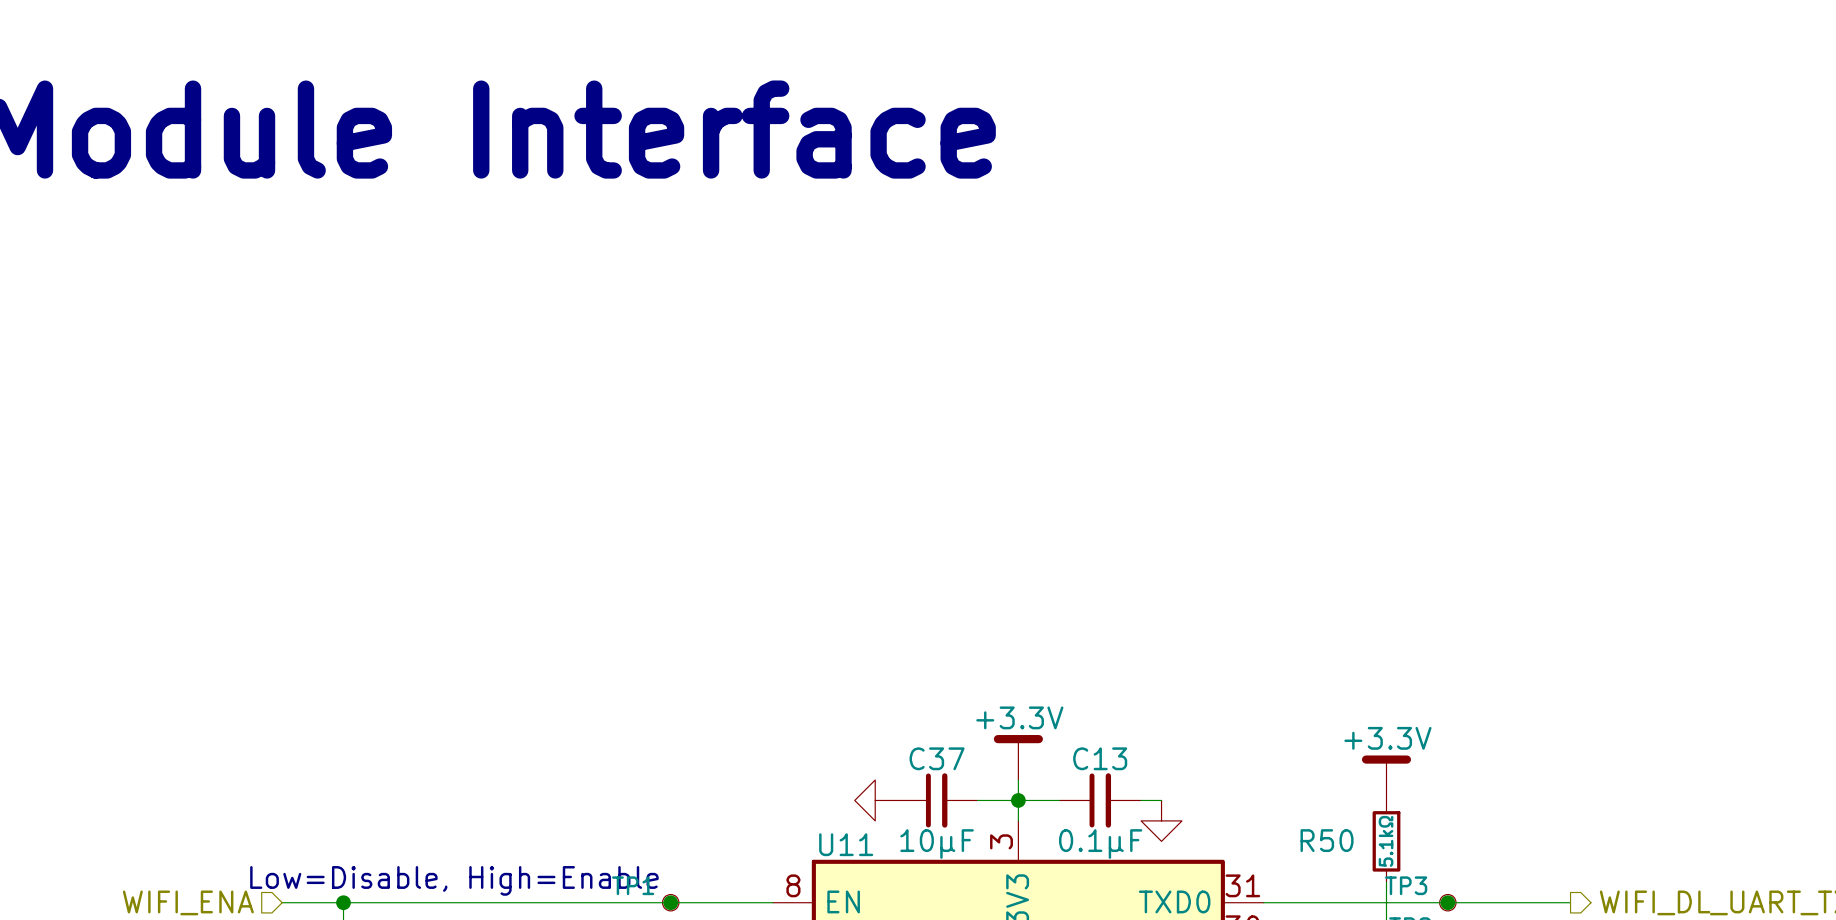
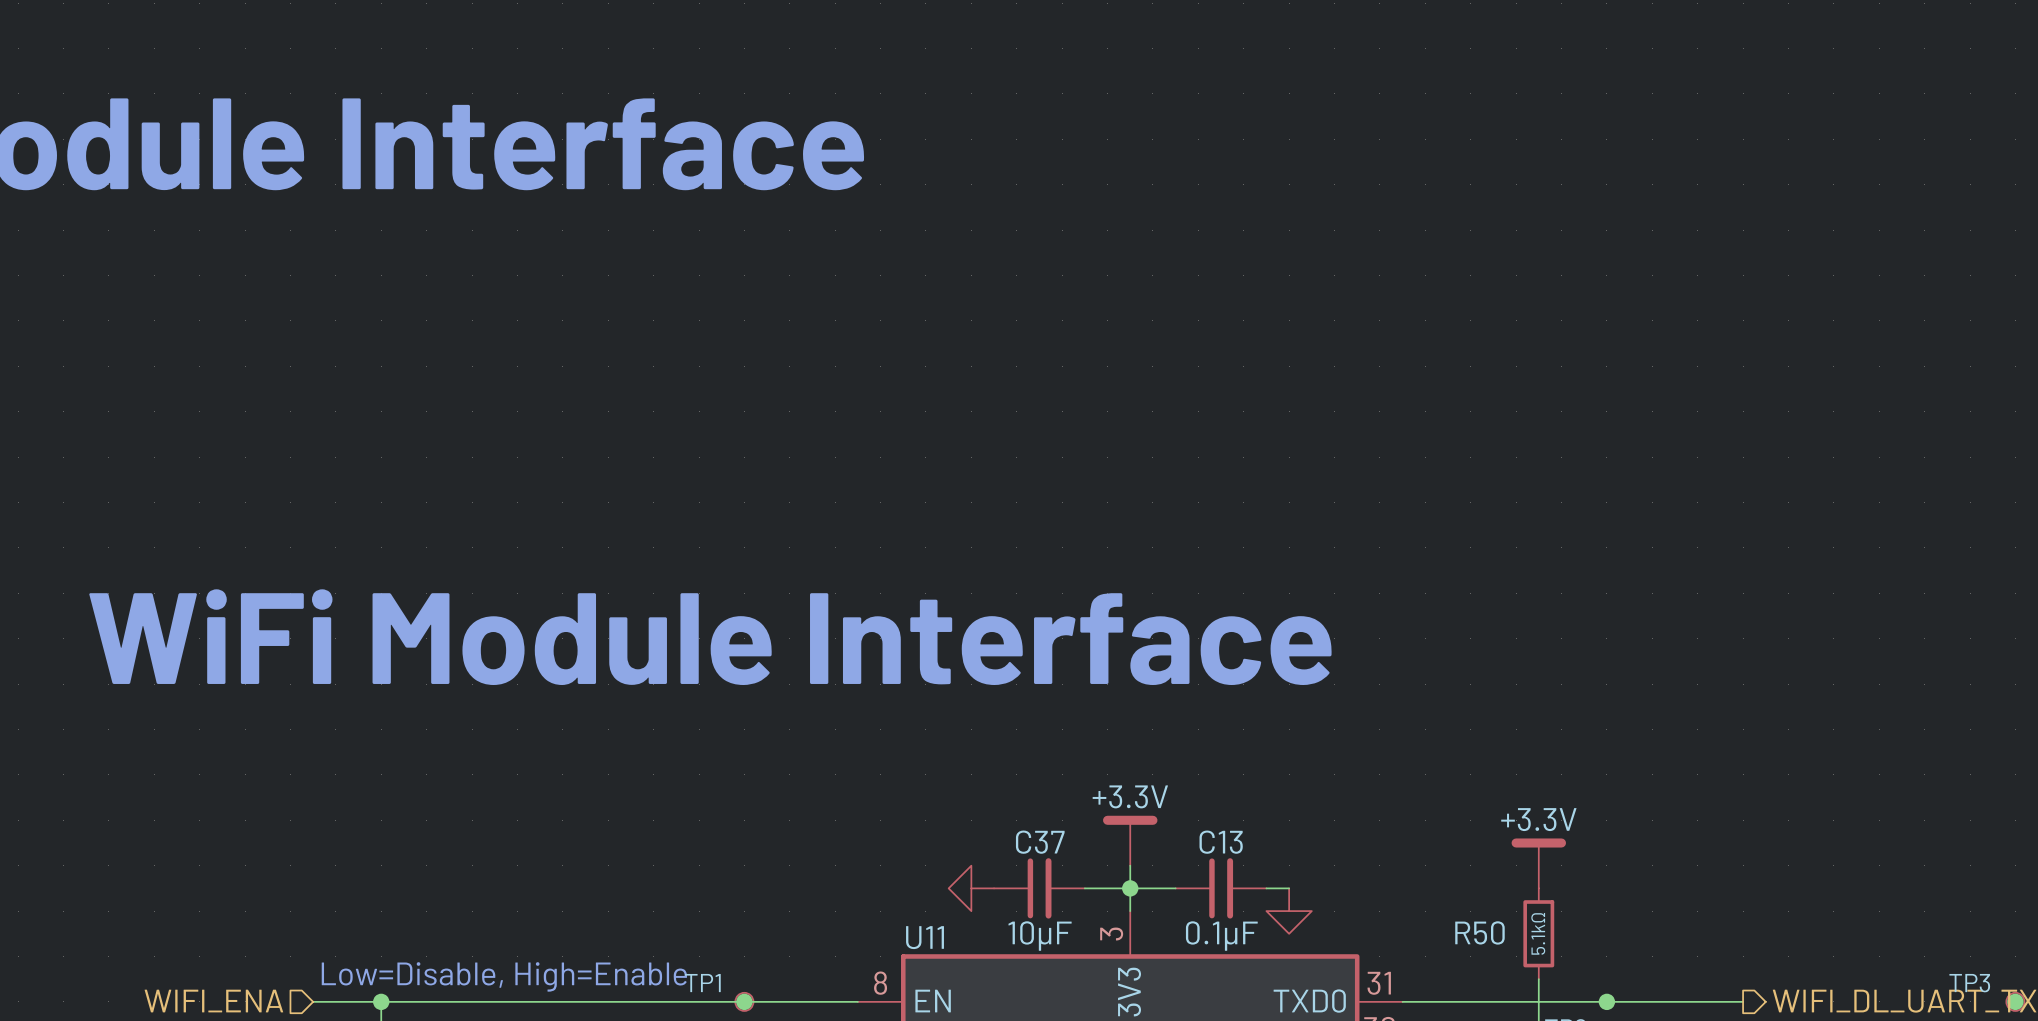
text: none -> WiFi Module Interface (710, 637)
TP3 position: (1447, 902) -> (2015, 1001)
junction: none -> (2015, 1001)

